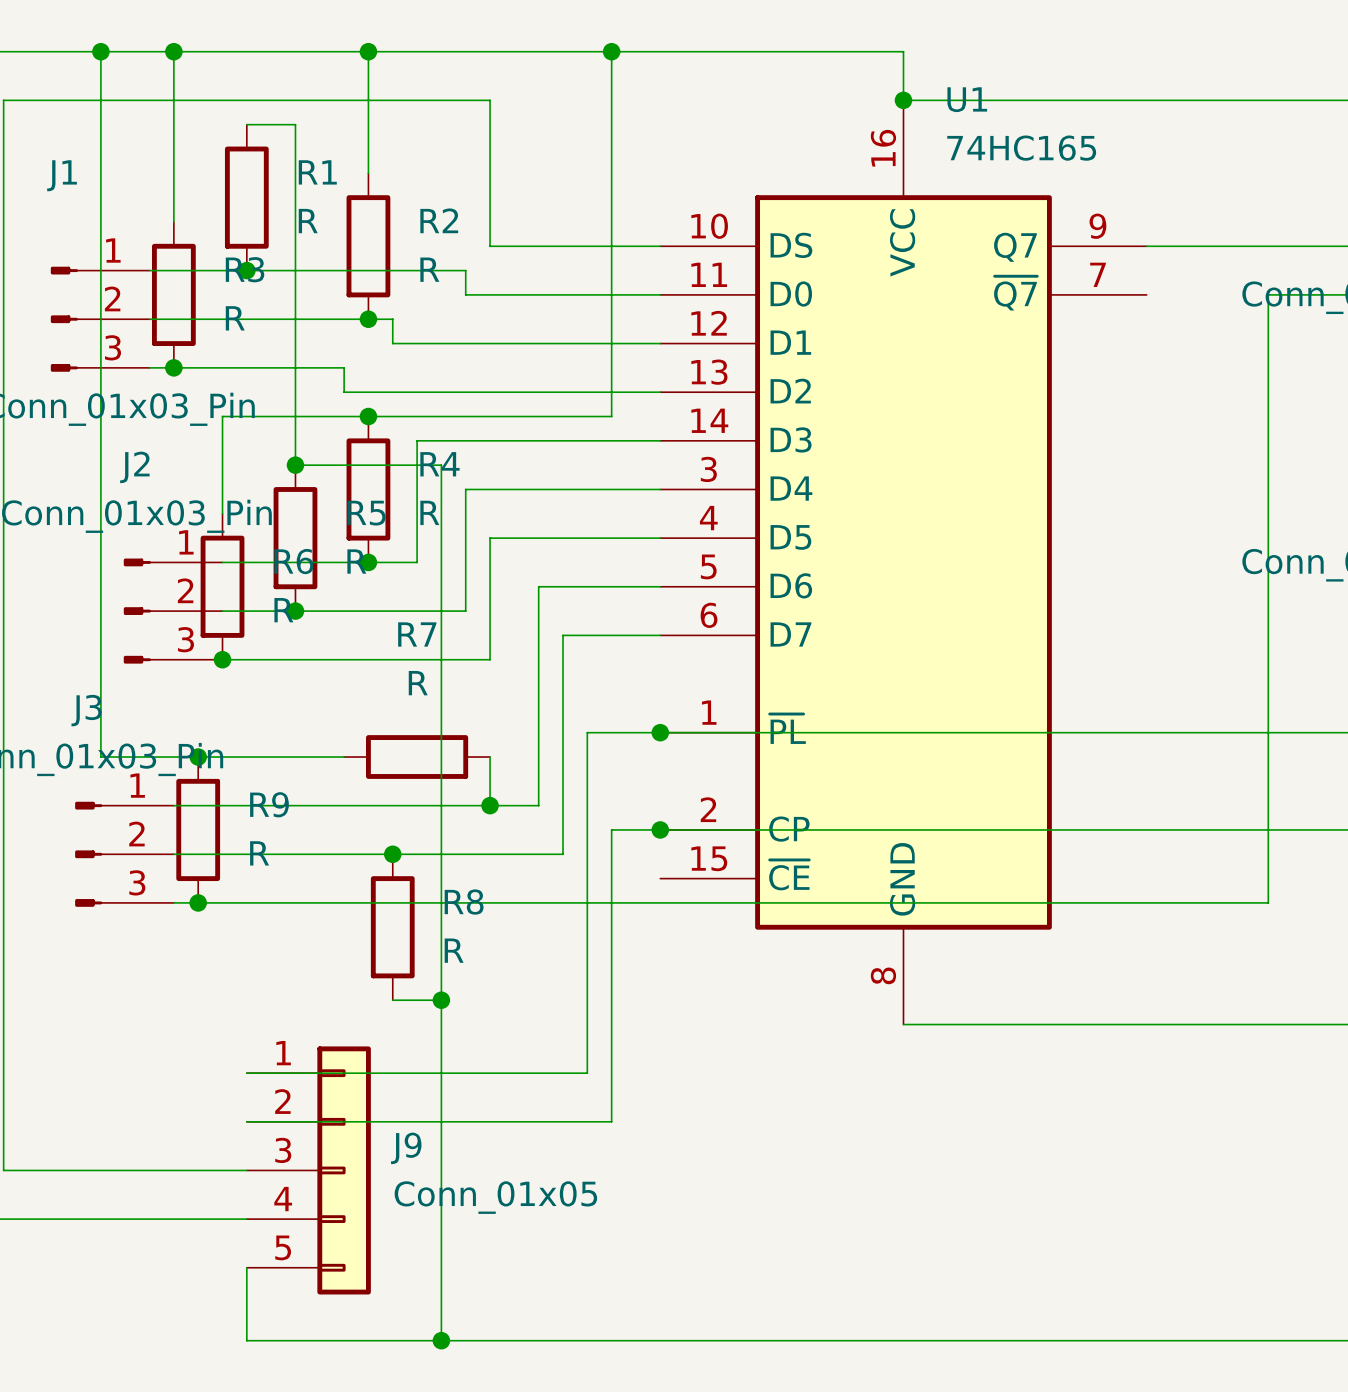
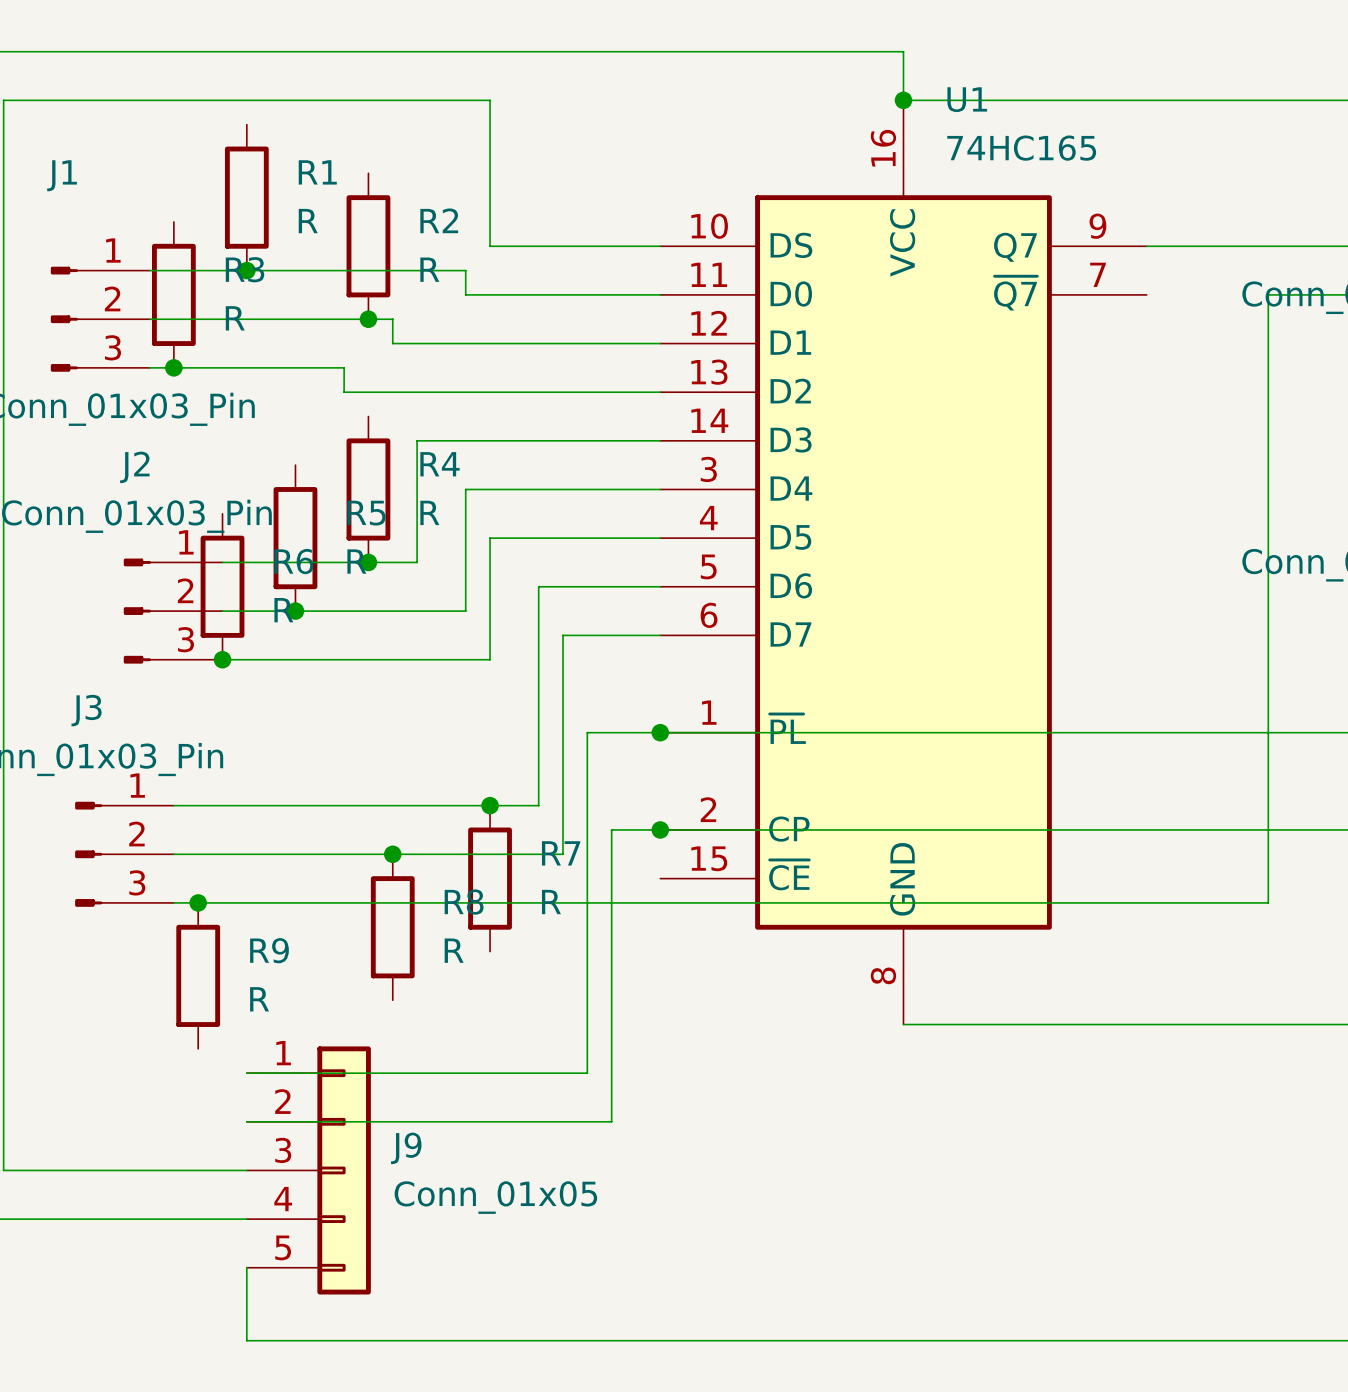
wire: (100, 51) (100, 757) (344, 757) -> none
junction: (100, 51) -> none
wire: (173, 51) (173, 221) -> none
junction: (173, 51) -> none
wire: (368, 51) (368, 173) -> none
junction: (368, 51) -> none
wire: (611, 51) (611, 416) (222, 416) (222, 513) -> none
junction: (611, 51) -> none
wire: (246, 124) (295, 124) (295, 465) (441, 465) (441, 1340) -> none
junction: (368, 416) -> none
junction: (295, 465) -> none
R7 name position: R7 (417, 634) -> R7 (561, 853)
junction: (198, 757) -> none
R7 rotation: 0° (417, 757) -> 90° clockwise (490, 878)
R7 position: (417, 757) -> (490, 878)
wire: (490, 757) (490, 805) -> none
R9 position: (198, 829) -> (198, 975)
wire: (392, 1000) (441, 1000) -> none
junction: (441, 1000) -> none
junction: (441, 1340) -> none

